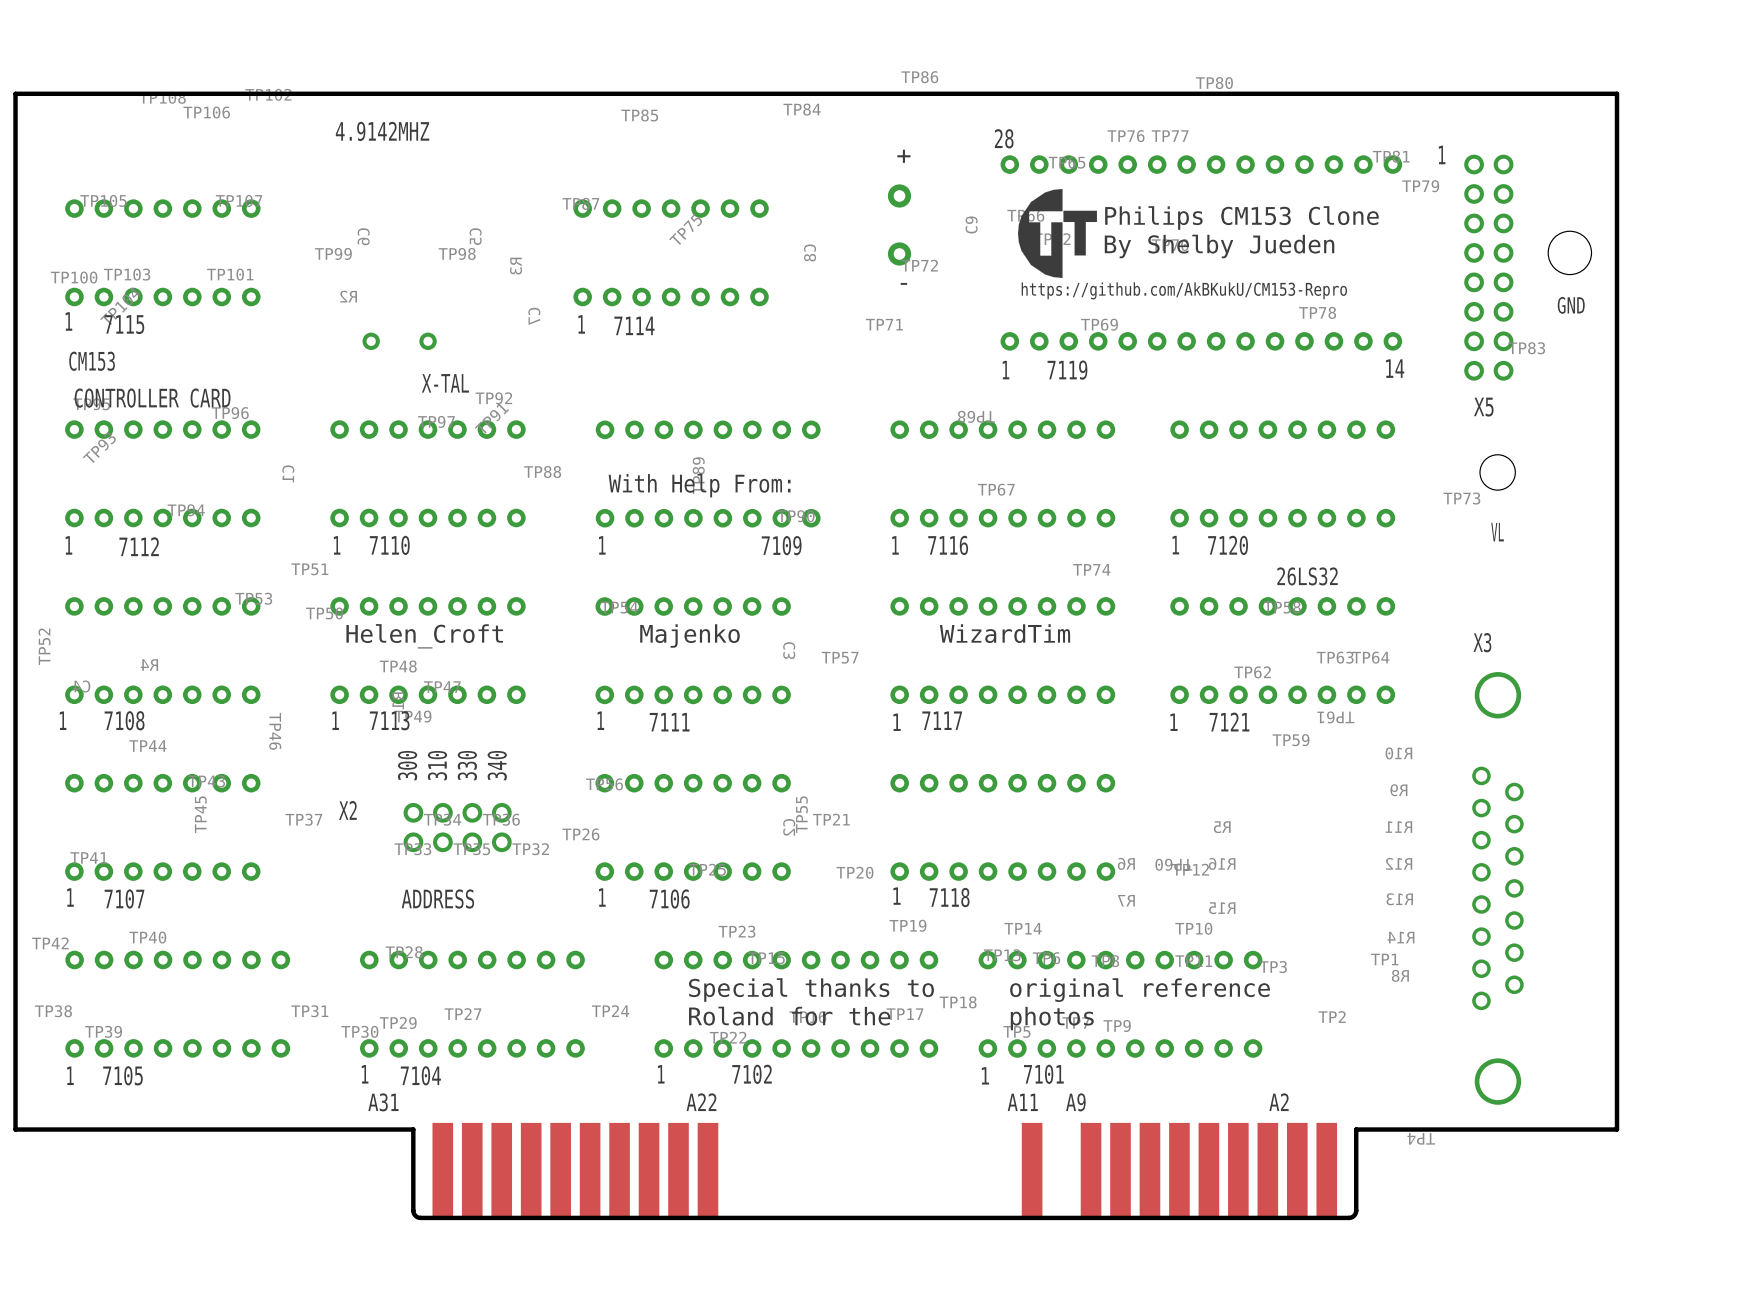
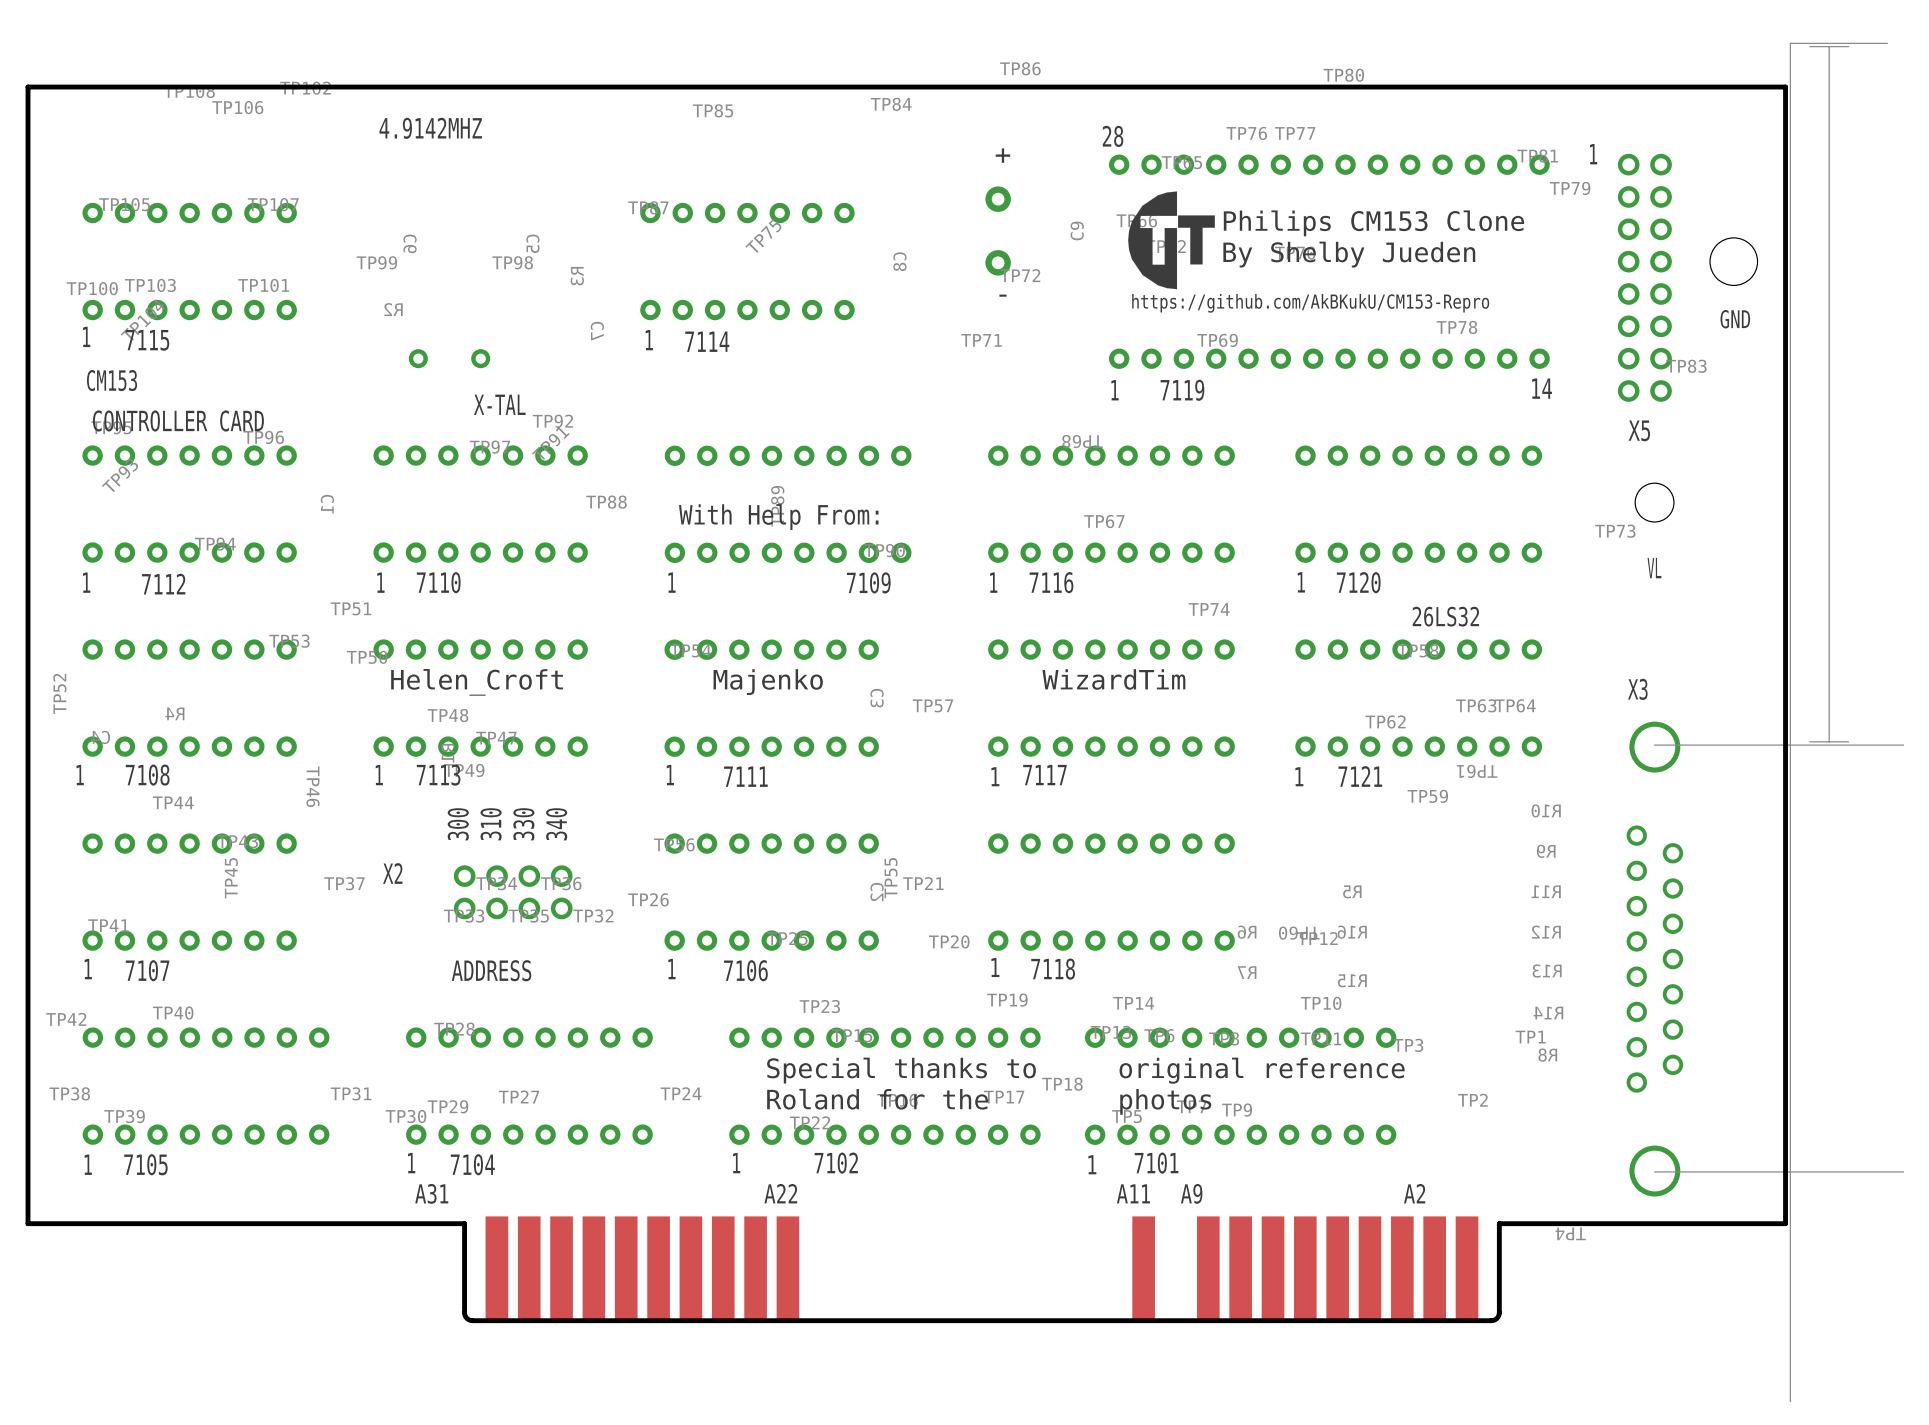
line: none -> (1887, 43) (1790, 43) (1790, 1401)
line: none -> (1809, 46) (1848, 46)
line: none -> (1829, 46) (1829, 741)
line: none -> (1809, 741) (1848, 741)
line: none -> (1654, 745) (1903, 745)
line: none -> (1654, 1171) (1903, 1171)

